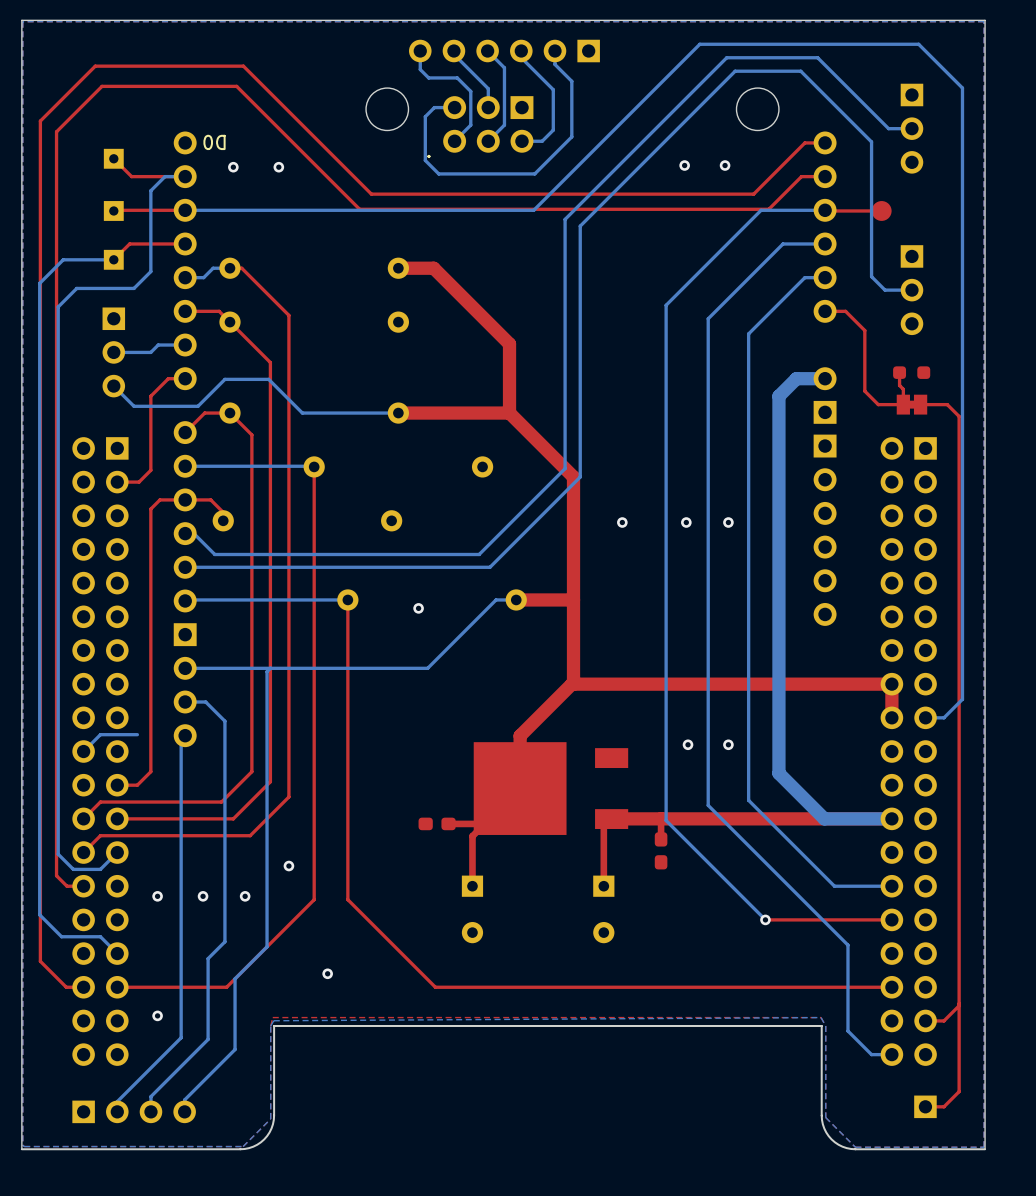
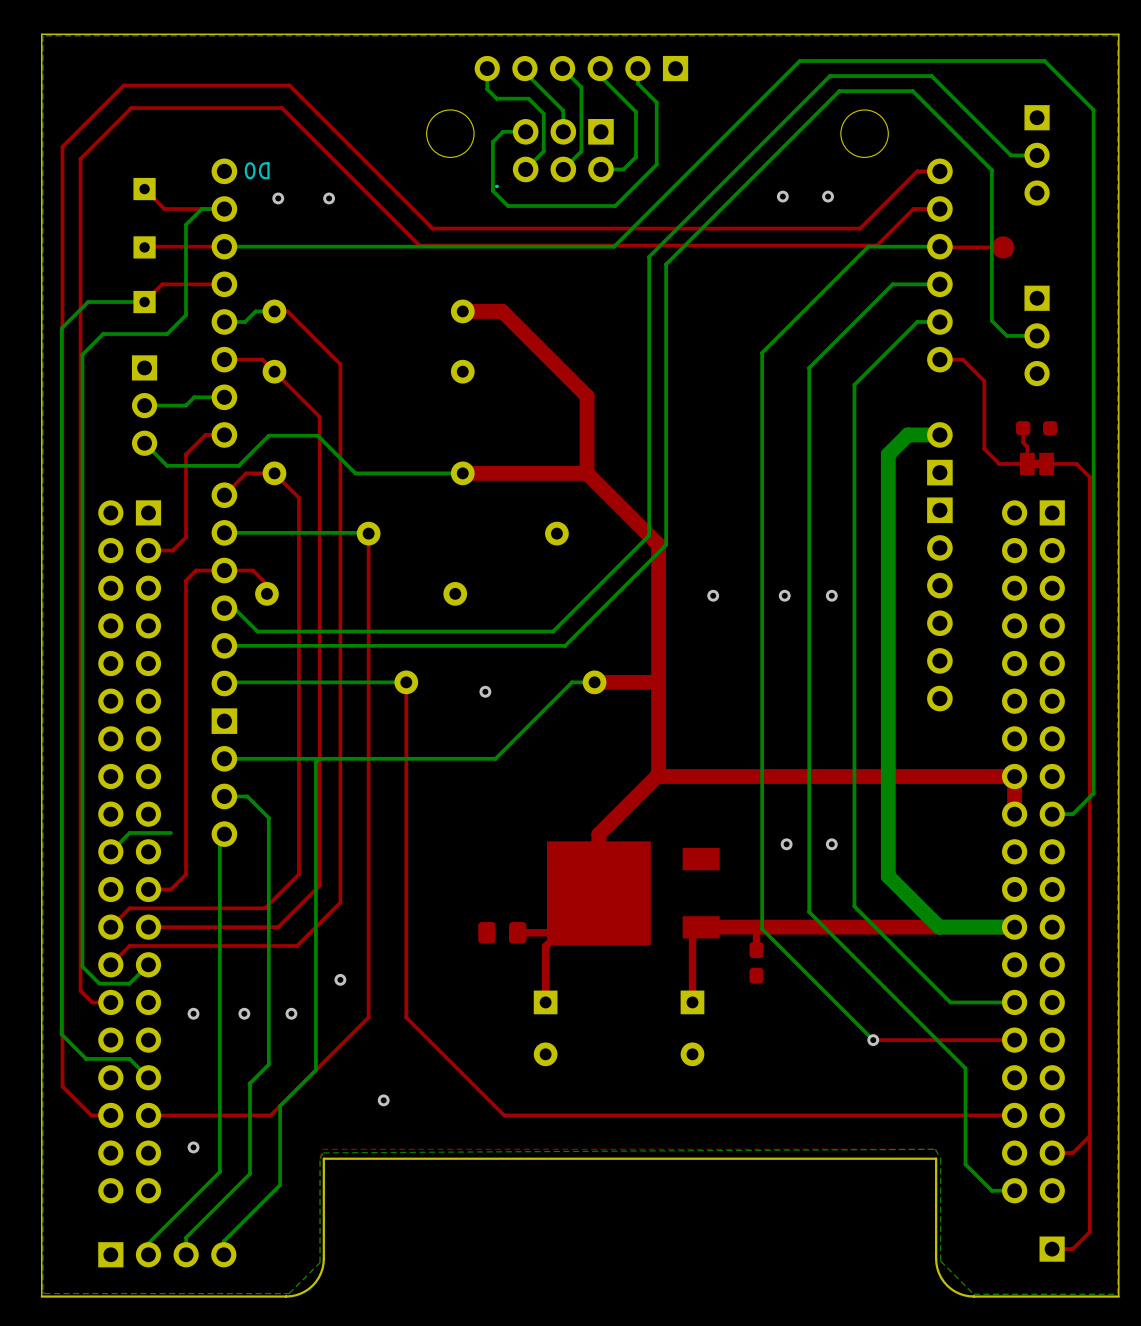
part footprint: [418, 817, 456, 831] -> [478, 922, 527, 944]

